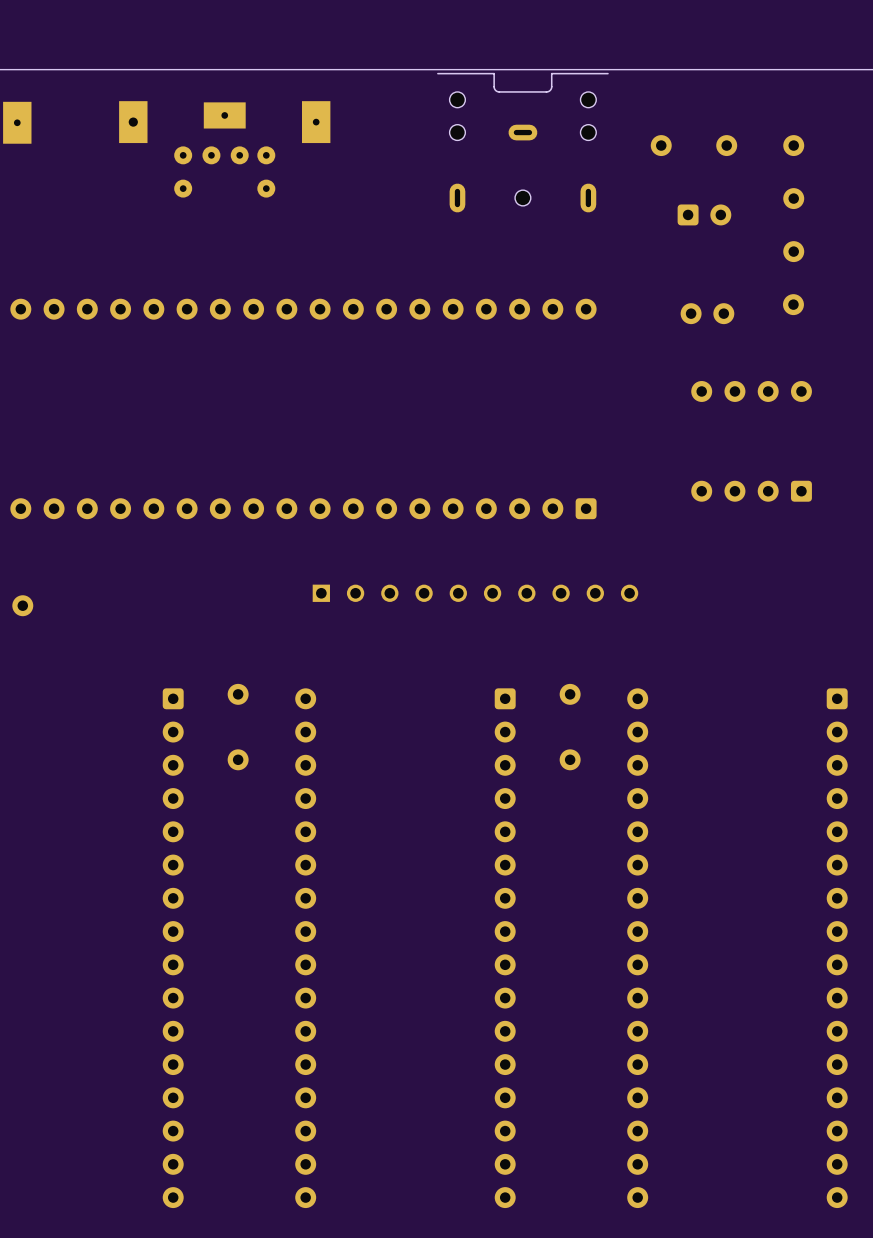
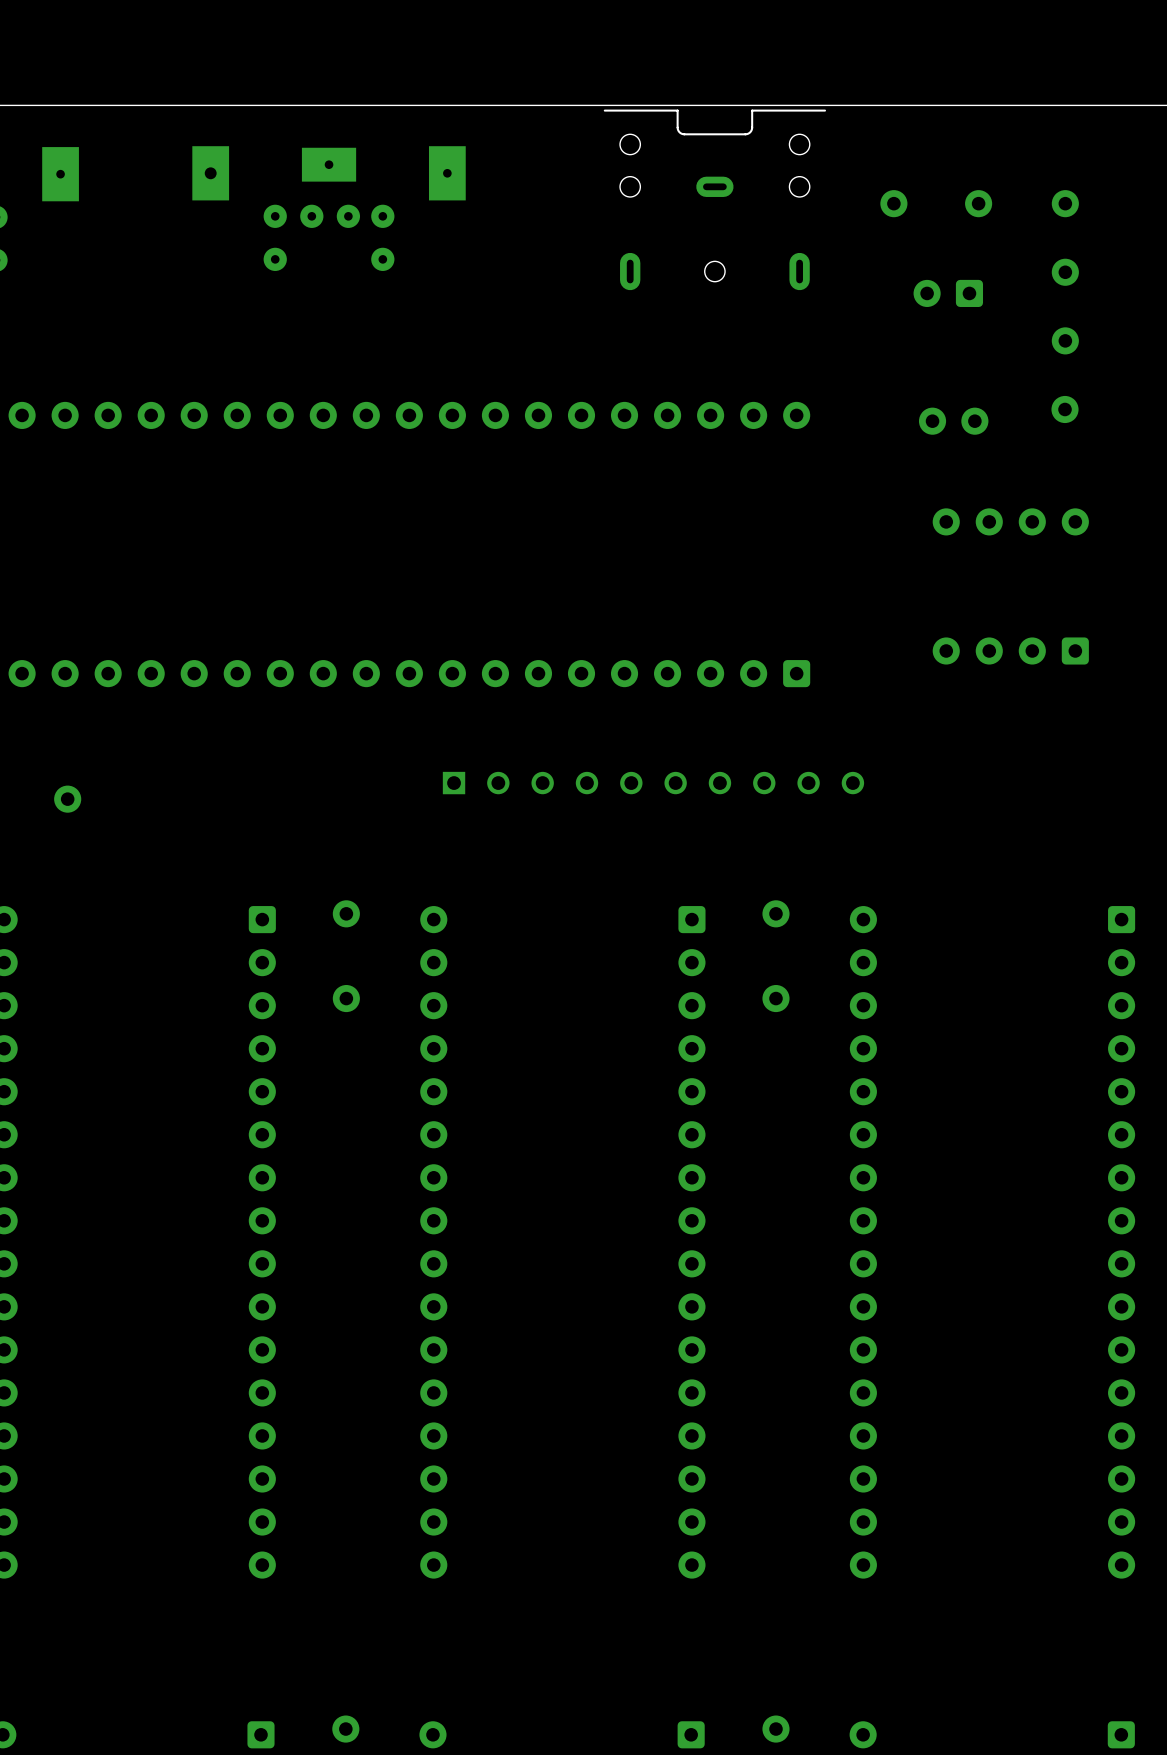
part rotation: 0° (704, 214) -> 180° (948, 293)

